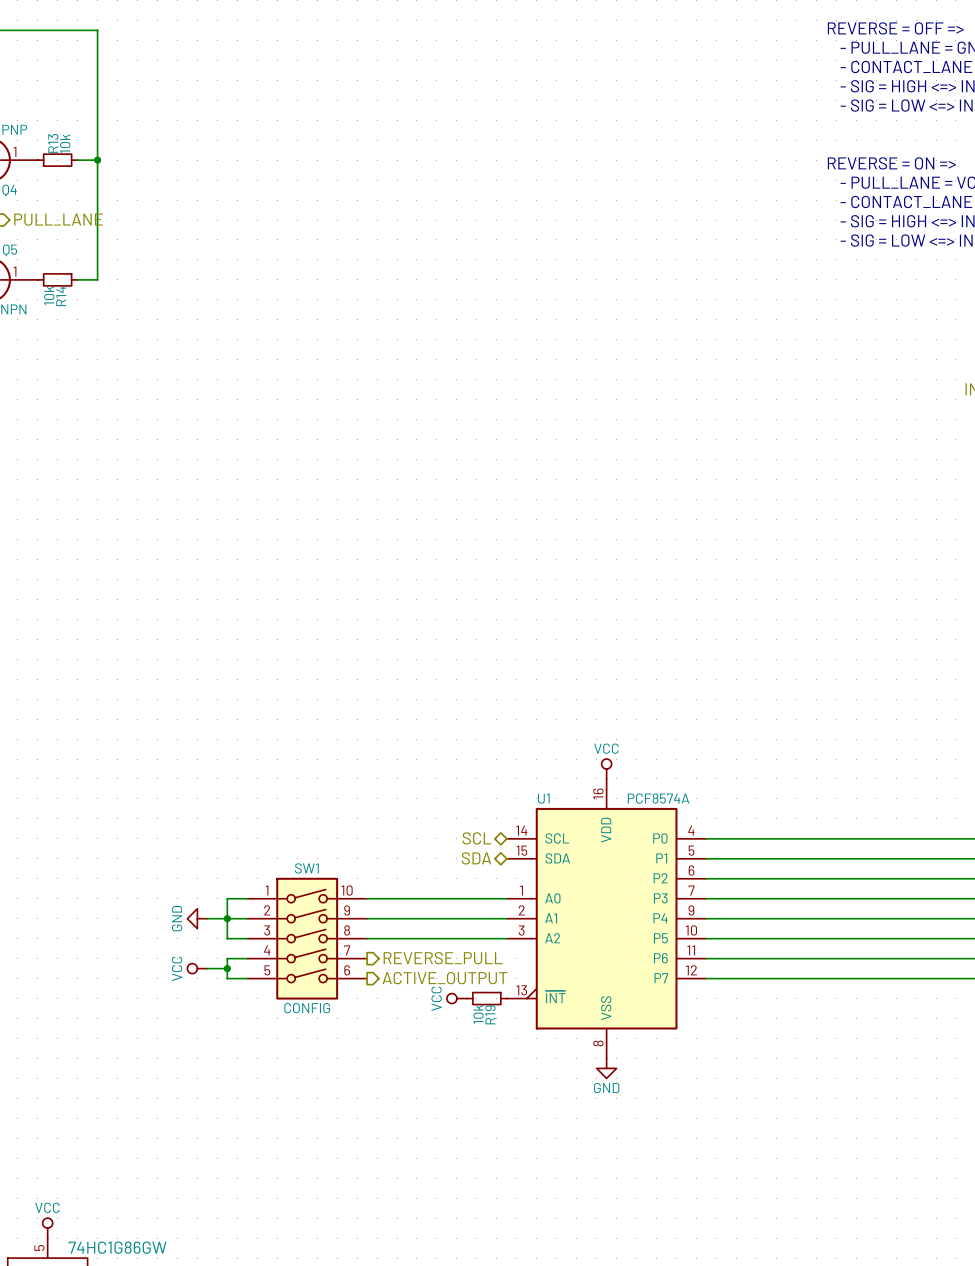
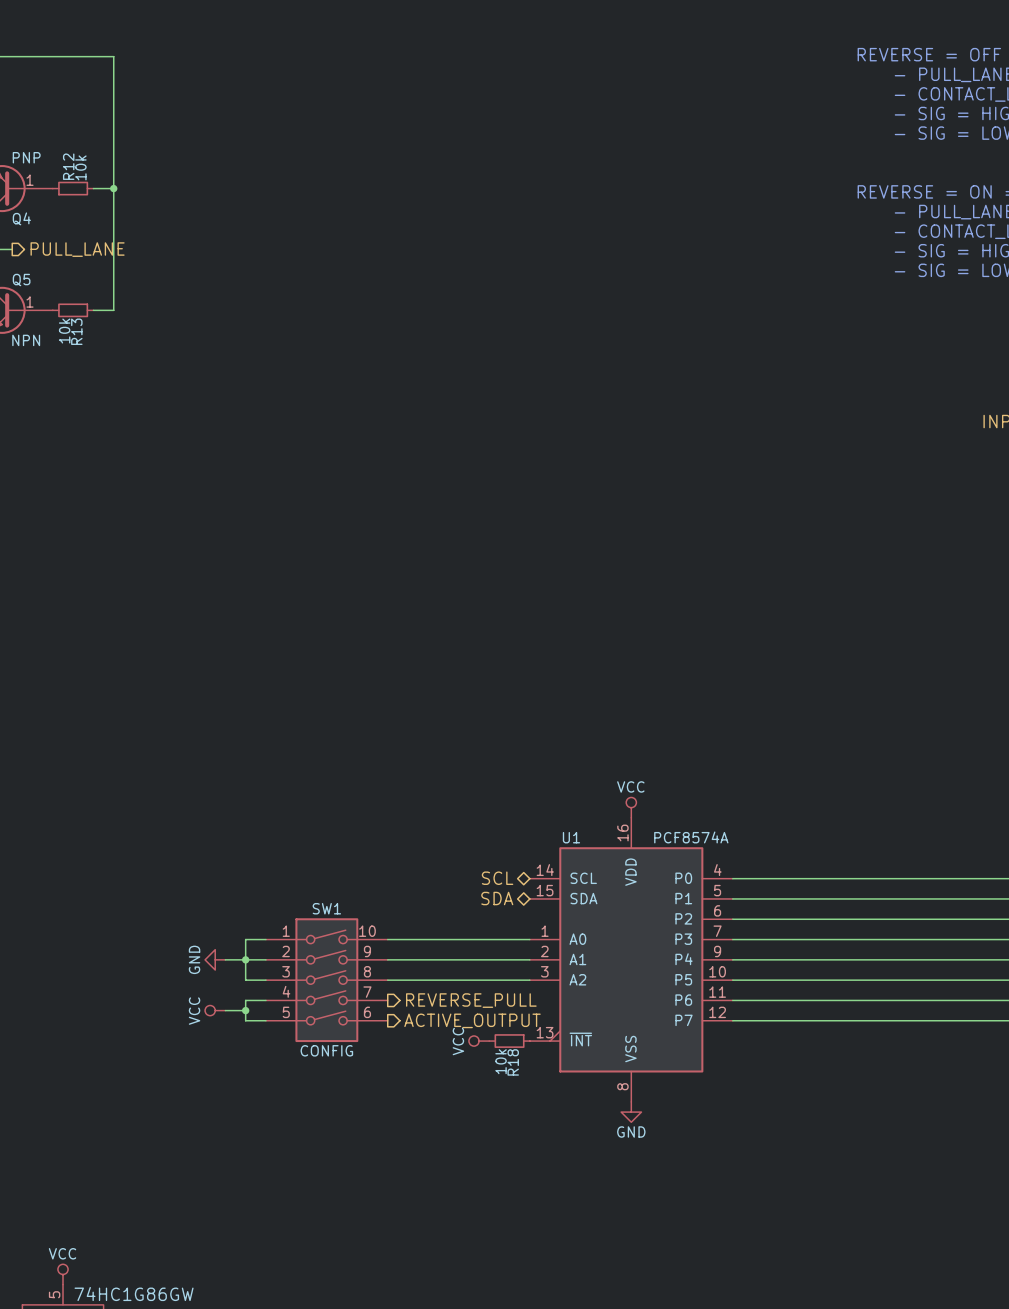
R13 name: R13 (53, 143) -> R12 (68, 166)
R14 name: R14 (61, 296) -> R13 (76, 331)
R19 name: R19 (490, 1014) -> R18 (513, 1062)

